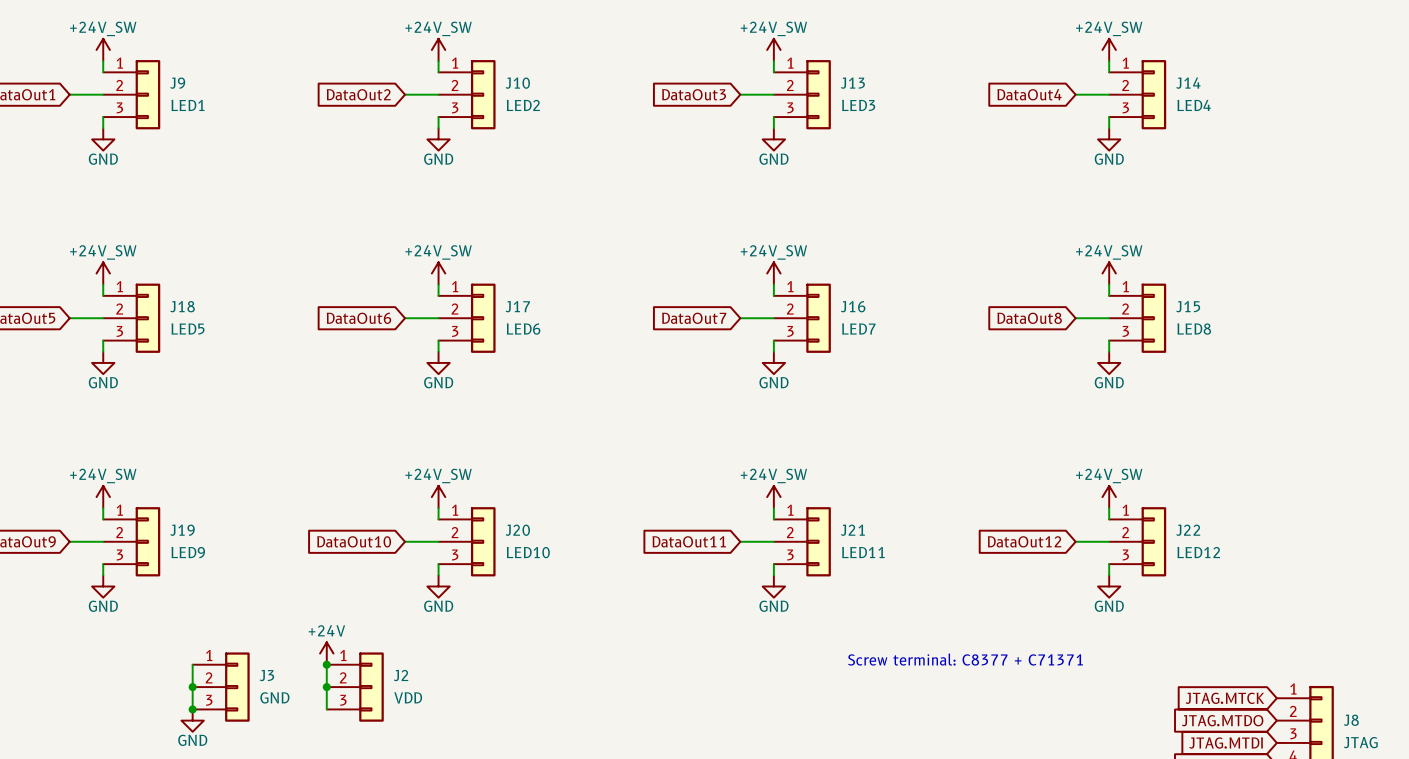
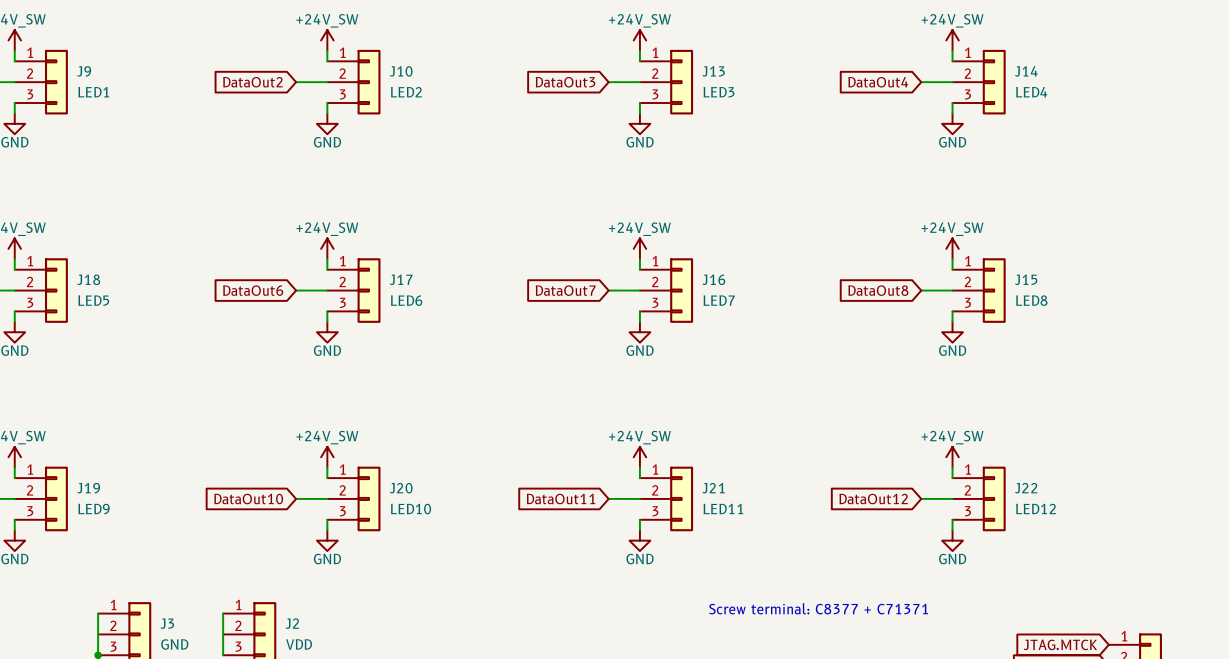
power symbol: +24V (326, 653) -> none
junction: (326, 664) -> none
junction: (192, 687) -> none
junction: (326, 687) -> none

